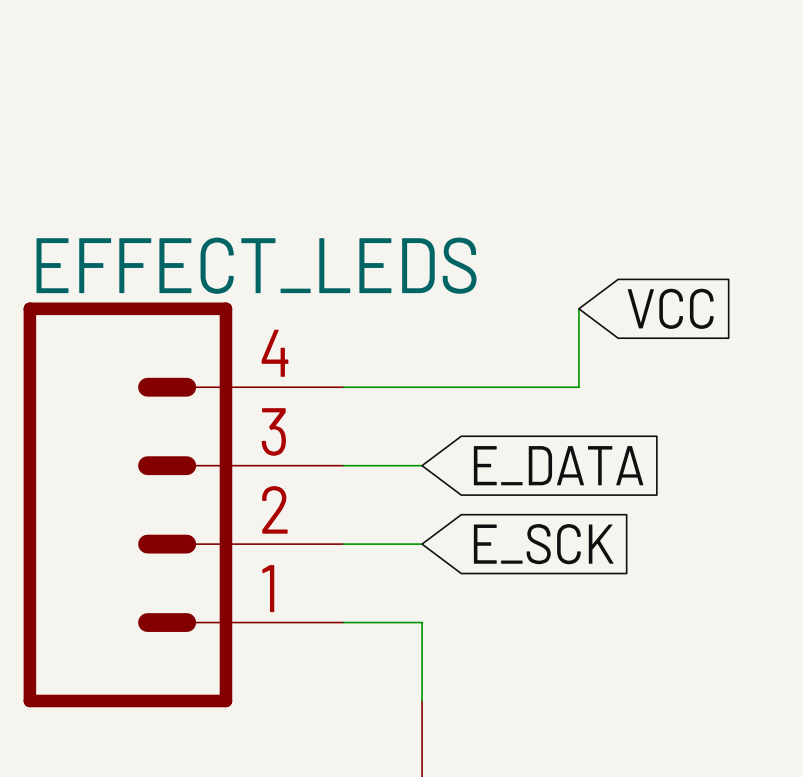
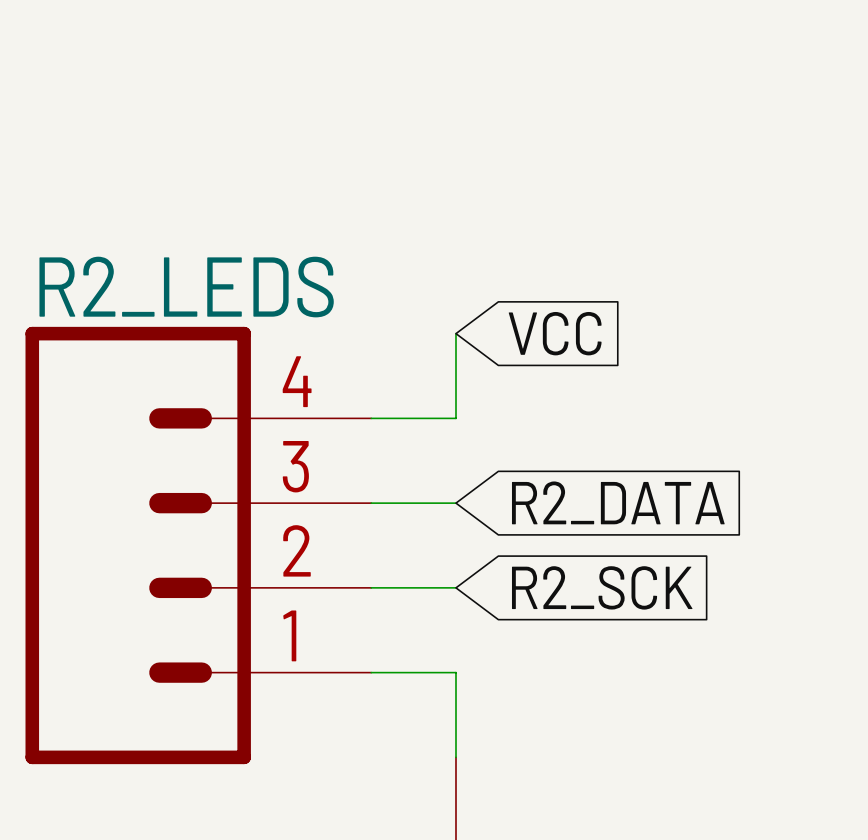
EFFECT_LEDS name: EFFECT_LEDS (256, 265) -> R2_LEDS (186, 287)
wire: (578, 308) (578, 387) (422, 387) -> (456, 333) (456, 418)
global label position: VCC (670, 308) -> VCC (555, 333)
global label: E_DATA (558, 465) -> R2_DATA (618, 502)
global label: E_SCK (543, 544) -> R2_SCK (602, 587)

